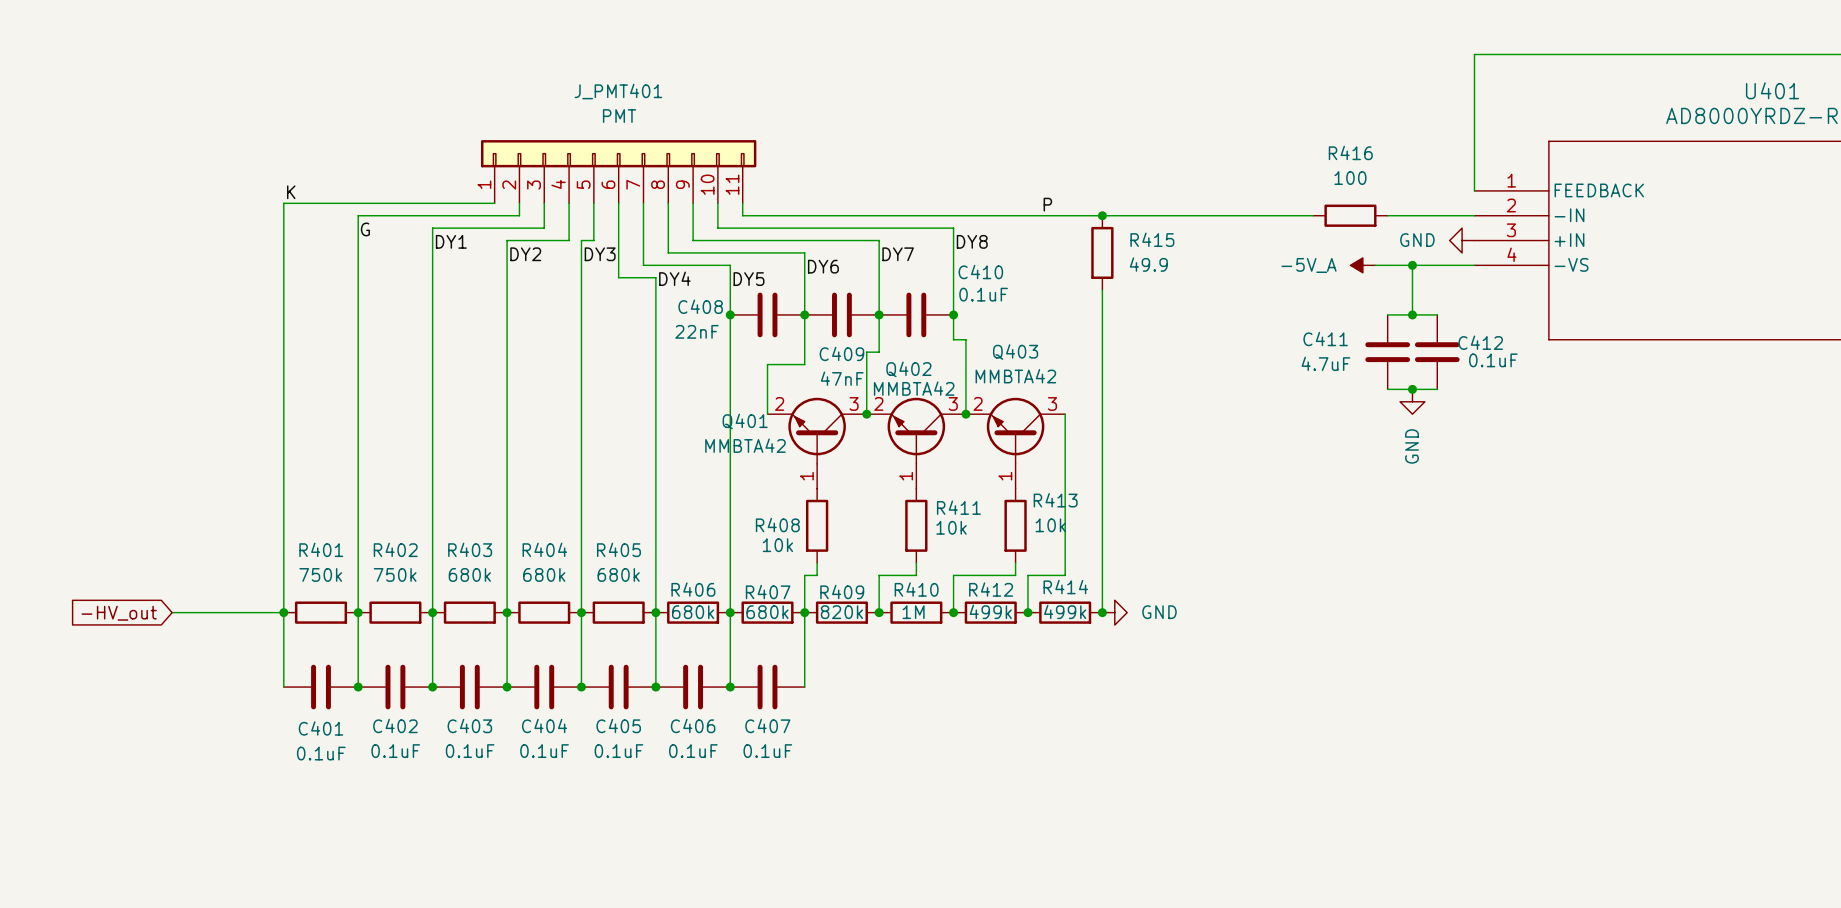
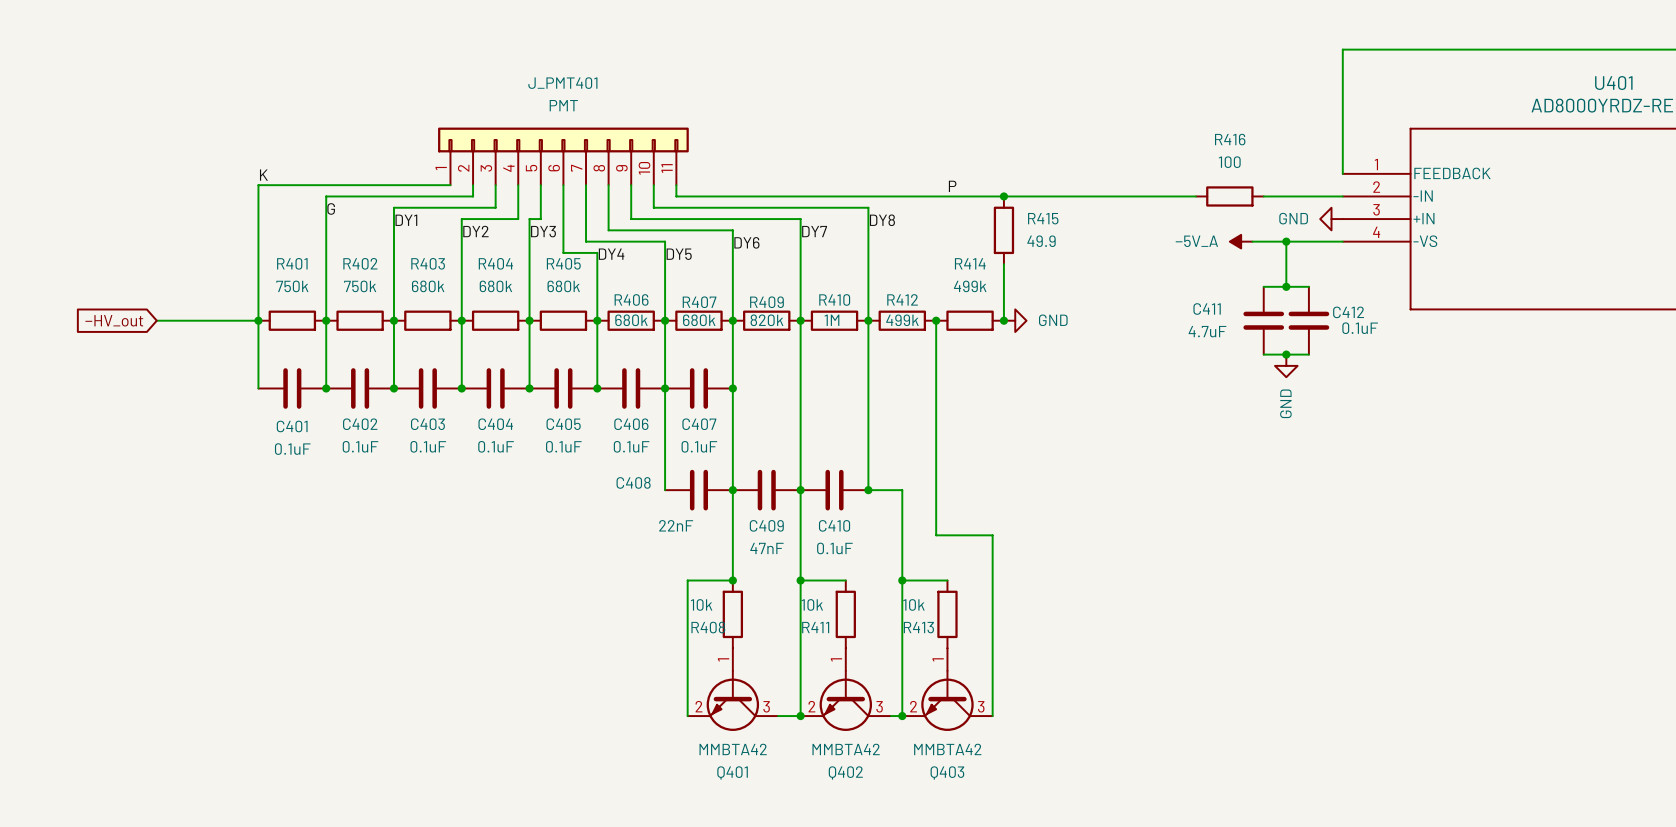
C410 name position: C410 (980, 272) -> C410 (834, 525)
C410 value position: 0.1uF (983, 294) -> 0.1uF (834, 548)
junction position: (730, 314) -> (665, 320)
C408 position: (767, 314) -> (698, 490)
junction position: (804, 314) -> (732, 320)
C409 position: (841, 314) -> (766, 490)
junction: (879, 314) -> none
C410 position: (916, 314) -> (834, 490)
junction: (953, 314) -> none
C408 value position: 22nF (696, 331) -> 22nF (676, 525)
wire: (953, 339) (965, 339) (965, 414) -> (868, 309) (868, 490) (902, 490) (902, 716) (890, 716)
global label: none -> −HV_out (114, 320)
wire: none -> (156, 320) (258, 320)
junction: none -> (258, 320)
junction: none -> (326, 320)
junction: none -> (393, 320)
junction: none -> (461, 320)
junction: none -> (529, 320)
junction: none -> (597, 320)
wire: (879, 352) (866, 352) (866, 414) -> (800, 320) (800, 524)
junction: none -> (800, 320)
junction: none -> (868, 320)
junction: none -> (936, 320)
wire: (1102, 352) (1102, 612) -> none
junction: none -> (1003, 320)
power symbol: none -> GND (1015, 320)
wire: (804, 364) (767, 364) (767, 414) -> (732, 332) (732, 524)
junction: (866, 414) -> none
junction: (965, 414) -> none
wire: (1065, 414) (1065, 575) (1027, 575) -> (936, 320) (936, 524)
Q401 name position: Q401 (745, 421) -> Q401 (732, 772)
wire: (283, 426) (283, 687) -> none
wire: (358, 426) (358, 687) -> none
junction: none -> (326, 388)
wire: (432, 426) (432, 687) -> none
junction: none -> (393, 388)
wire: (507, 426) (507, 687) -> none
junction: none -> (461, 388)
wire: (581, 426) (581, 687) -> none
junction: none -> (529, 388)
wire: (655, 426) (655, 687) -> none
junction: none -> (597, 388)
junction: none -> (665, 388)
junction: none -> (732, 388)
Q401 flip: as is (817, 430) -> up-down (732, 700)
Q402 flip: as is (916, 430) -> up-down (845, 700)
Q403 flip: as is (1015, 430) -> up-down (947, 700)
Q401 position: (817, 443) -> (732, 689)
Q402 position: (916, 443) -> (845, 689)
Q403 position: (1015, 443) -> (947, 689)
Q401 value position: MMBTA42 (745, 445) -> MMBTA42 (733, 749)
R413 name position: R413 (1055, 500) -> R413 (918, 627)
R411 name position: R411 (958, 507) -> R411 (815, 627)
R408 name position: R408 (777, 525) -> R408 (708, 627)
R408 position: (817, 525) -> (732, 614)
R411 position: (916, 525) -> (845, 614)
R413 position: (1015, 525) -> (947, 614)
R413 value position: 10k (1050, 525) -> 10k (913, 604)
R411 value position: 10k (951, 527) -> 10k (812, 604)
wire: (730, 538) (730, 687) -> none
junction: none -> (732, 490)
junction: none -> (800, 490)
junction: none -> (868, 490)
R408 value position: 10k (777, 545) -> 10k (701, 604)
wire: (817, 563) (817, 575) (804, 575) -> none
wire: (916, 563) (916, 575) (879, 575) -> none
wire: (1015, 563) (1015, 575) (953, 575) (953, 612) -> none
wire: (1027, 587) (1027, 612) -> (936, 535) (992, 535) (992, 716)
R414 name position: R414 (1065, 587) -> R414 (970, 263)
R414 value position: 499k (1065, 611) -> 499k (970, 286)
wire: (172, 612) (283, 612) -> none
junction: (283, 612) -> none
R401 position: (321, 612) -> (292, 320)
junction: (358, 612) -> none
R402 position: (395, 612) -> (360, 320)
junction: (432, 612) -> none
R403 position: (469, 612) -> (427, 320)
junction: (507, 612) -> none
R404 position: (544, 612) -> (495, 320)
junction: (581, 612) -> none
R405 position: (618, 612) -> (563, 320)
junction: (655, 612) -> none
R406 position: (693, 612) -> (631, 320)
junction: (730, 612) -> none
R407 position: (767, 612) -> (698, 320)
junction position: (804, 612) -> (732, 580)
R409 position: (841, 612) -> (766, 320)
wire: none -> (800, 557) (800, 716) (778, 716)
junction position: (879, 612) -> (800, 580)
R410 position: (916, 612) -> (834, 320)
junction: (953, 612) -> none
R412 position: (990, 612) -> (902, 320)
junction: (1027, 612) -> none
R414 position: (1065, 612) -> (970, 320)
junction: (1102, 612) -> none
power symbol: GND (1114, 612) -> none
global label: −HV_out (119, 613) -> none
wire: (804, 637) (804, 687) -> (732, 580) (687, 580) (687, 716)
wire: none -> (800, 580) (845, 580)
wire: none -> (902, 580) (947, 580)
junction: none -> (902, 580)
C401 position: (321, 687) -> (292, 388)
junction: (358, 687) -> none
C402 position: (395, 687) -> (360, 388)
junction: (432, 687) -> none
C403 position: (469, 687) -> (427, 388)
junction: (507, 687) -> none
C404 position: (544, 687) -> (495, 388)
junction: (581, 687) -> none
C405 position: (618, 687) -> (563, 388)
junction: (655, 687) -> none
C406 position: (693, 687) -> (631, 388)
junction: (730, 687) -> none
C407 position: (767, 687) -> (698, 388)
junction: none -> (800, 716)
junction: none -> (902, 716)

